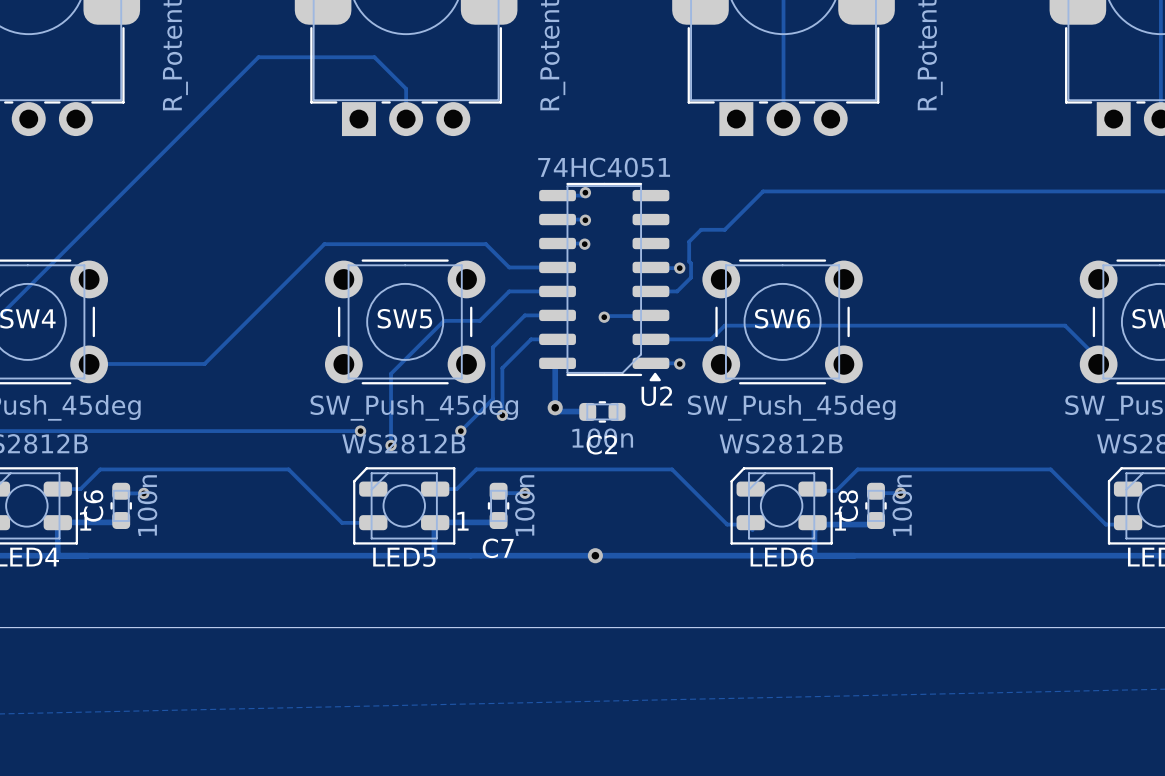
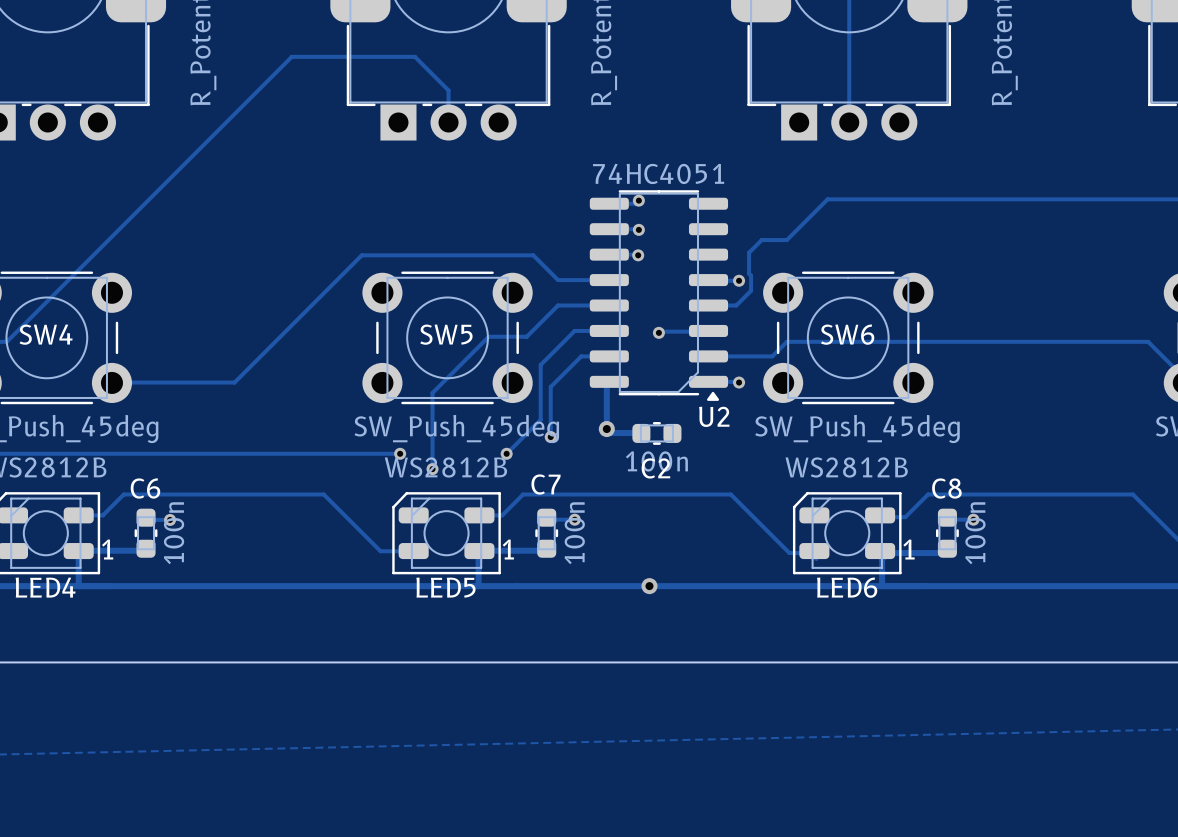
C6 name rotation: 0° (93, 505) -> 90° clockwise (145, 488)
C6 name position: C6 (93, 505) -> C6 (145, 488)
C8 name rotation: 0° (848, 506) -> 90° clockwise (946, 488)
C8 name position: C8 (848, 506) -> C8 (946, 488)
C7 name position: C7 (498, 548) -> C7 (545, 484)

